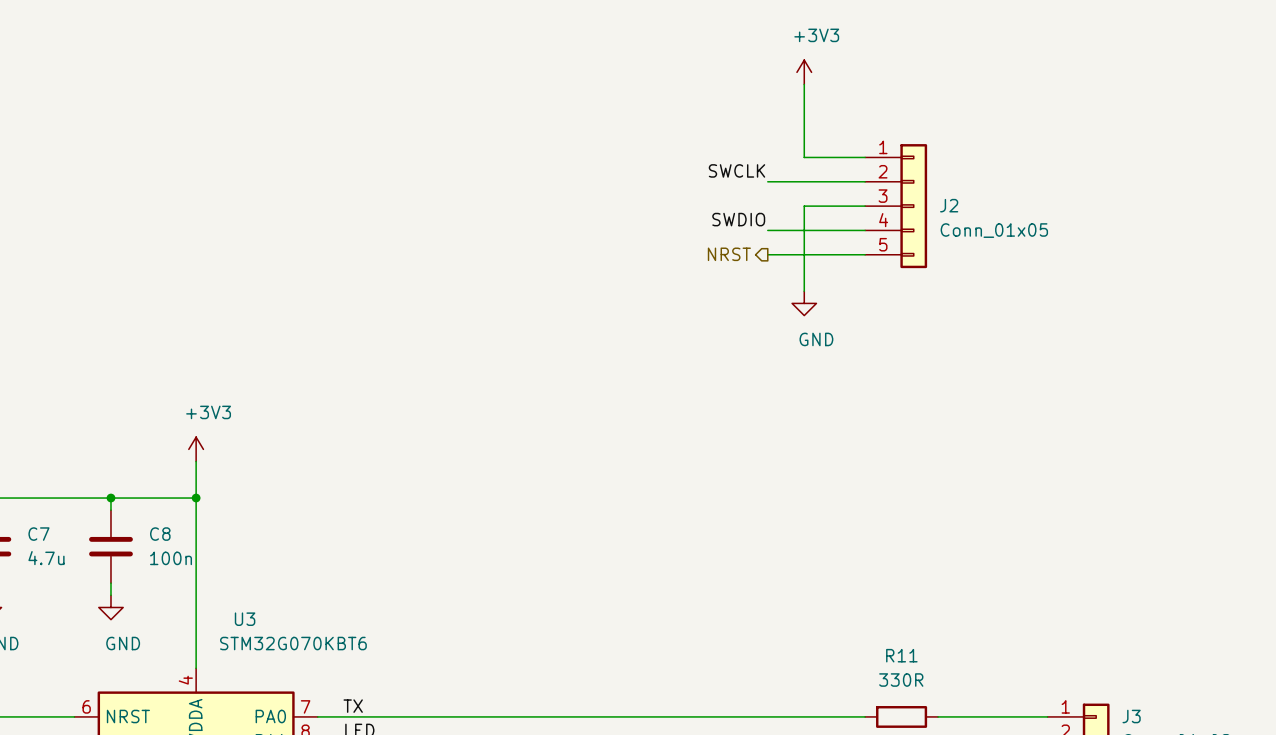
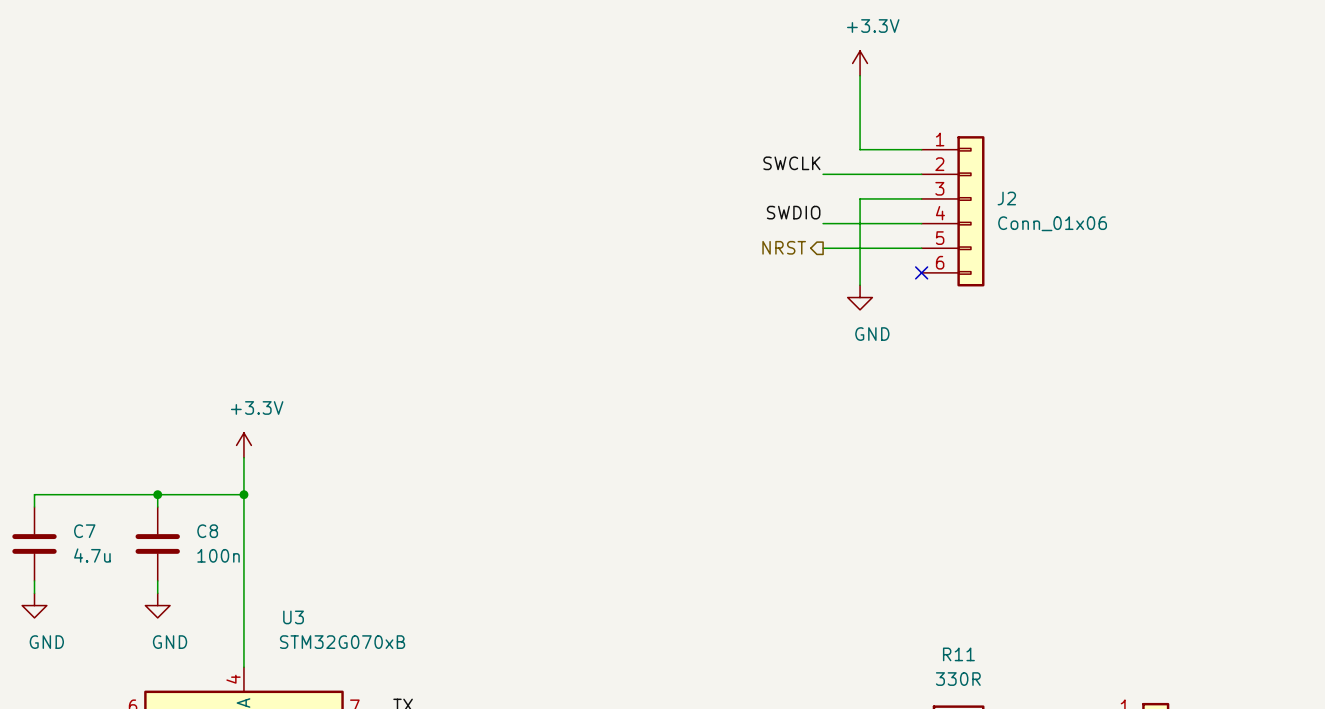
power symbol: +3V3 (804, 72) -> +3.3V (860, 63)
J2 symbol: [865, 144, 928, 269] -> [921, 136, 985, 287]
J2 value: Conn_01x05 (994, 230) -> Conn_01x06 (1052, 223)
no-connect mark: none -> (921, 272)
power symbol: +3V3 (196, 449) -> +3.3V (243, 445)
U3 value: STM32G070KBT6 (293, 643) -> STM32G070xB (342, 642)

